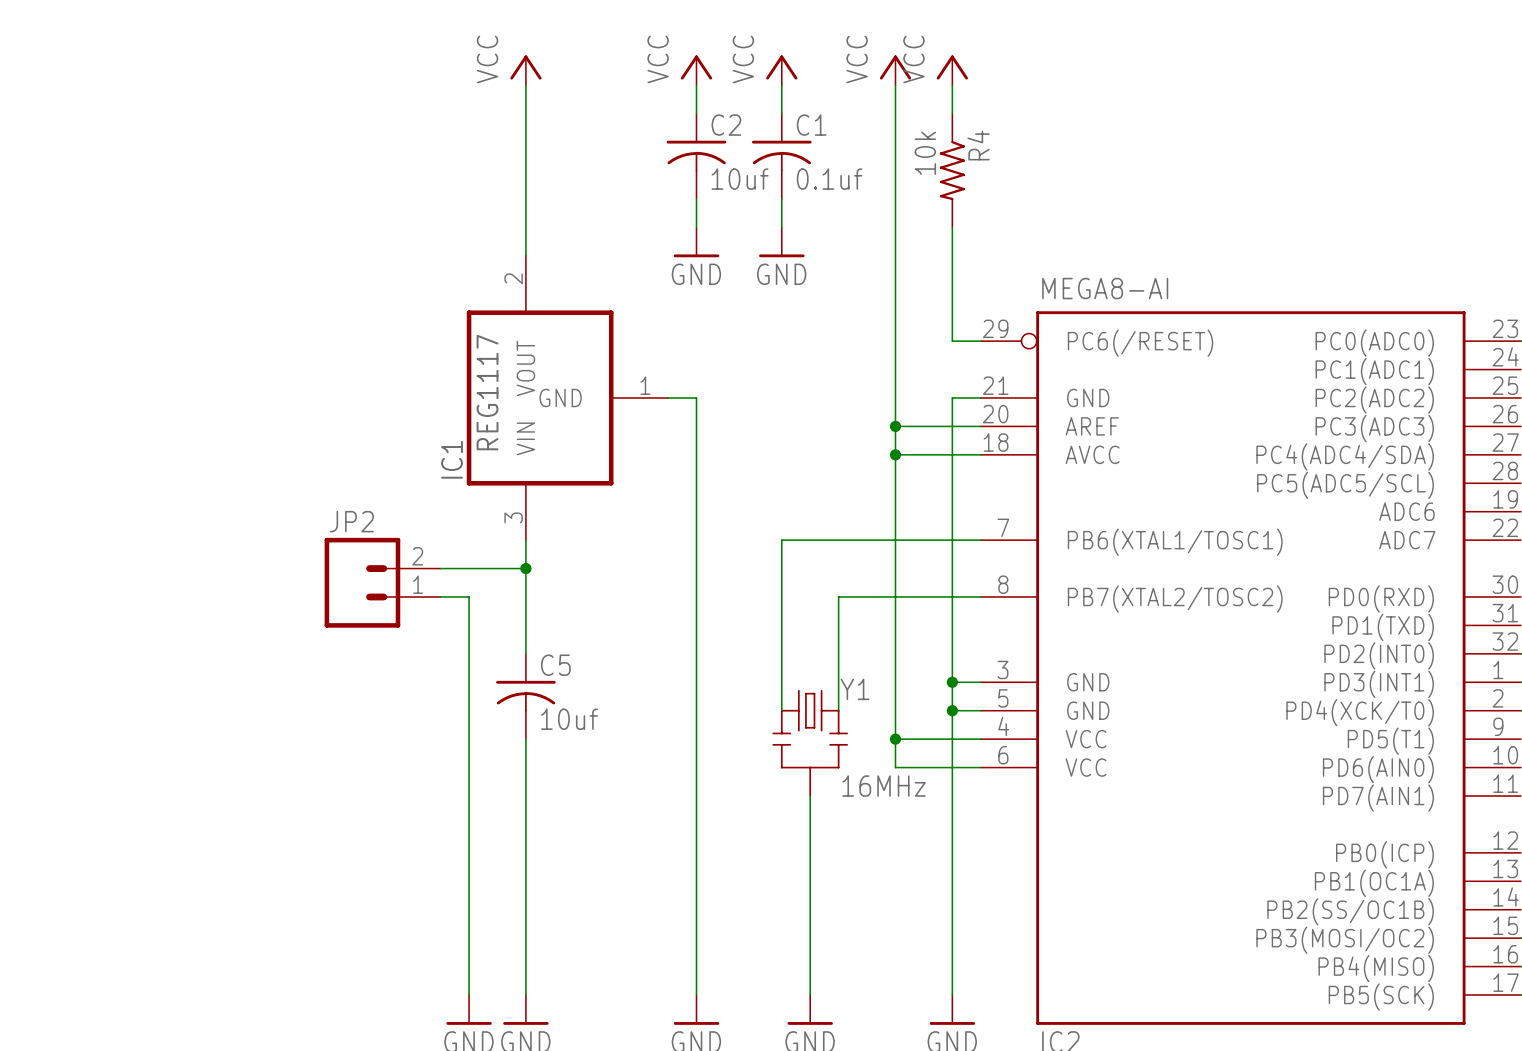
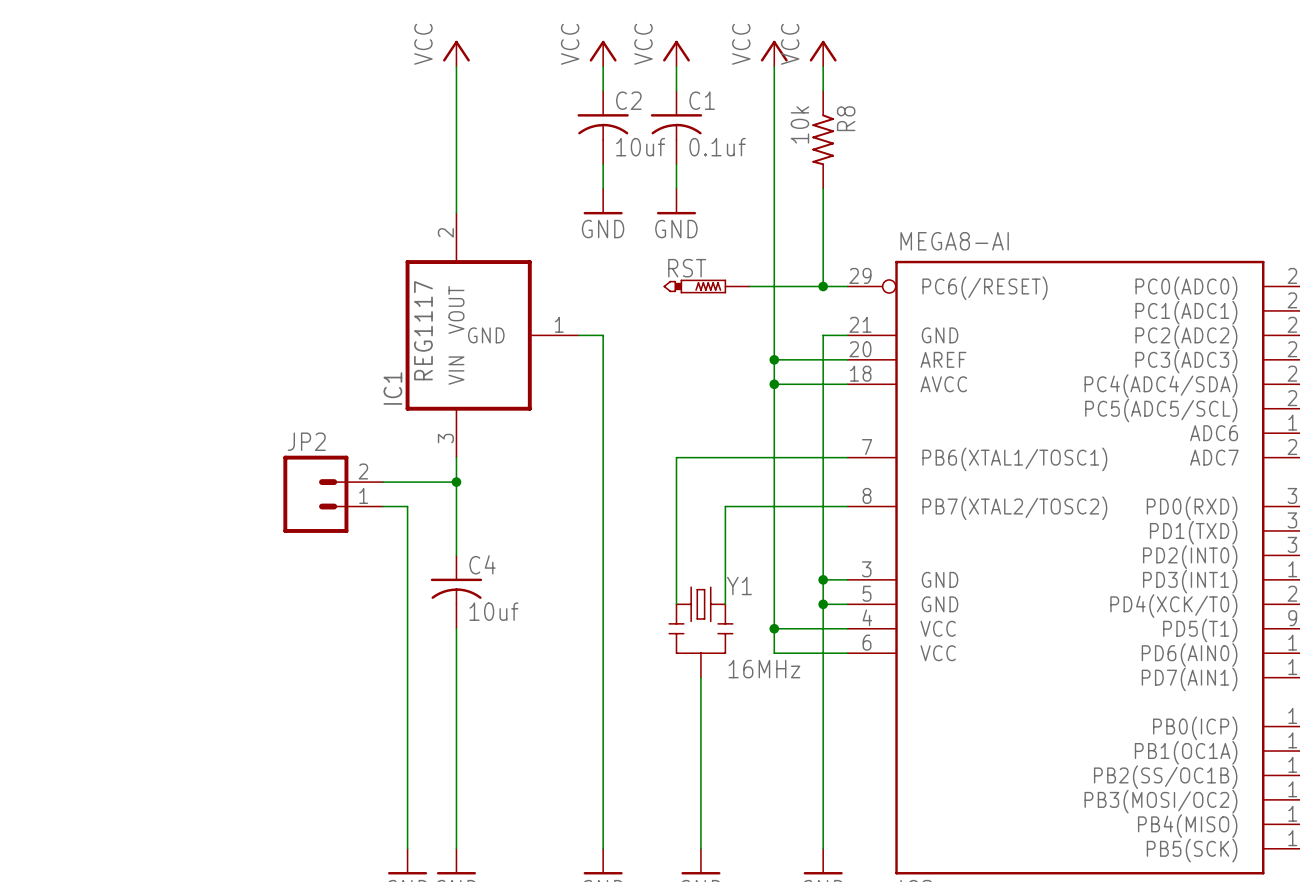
R4 name: R4 (978, 145) -> R8 (846, 118)
RST: none -> (706, 286)
wire: none -> (749, 286) (823, 286)
junction: none -> (823, 286)
C5 name: C5 (555, 665) -> C4 (482, 564)

